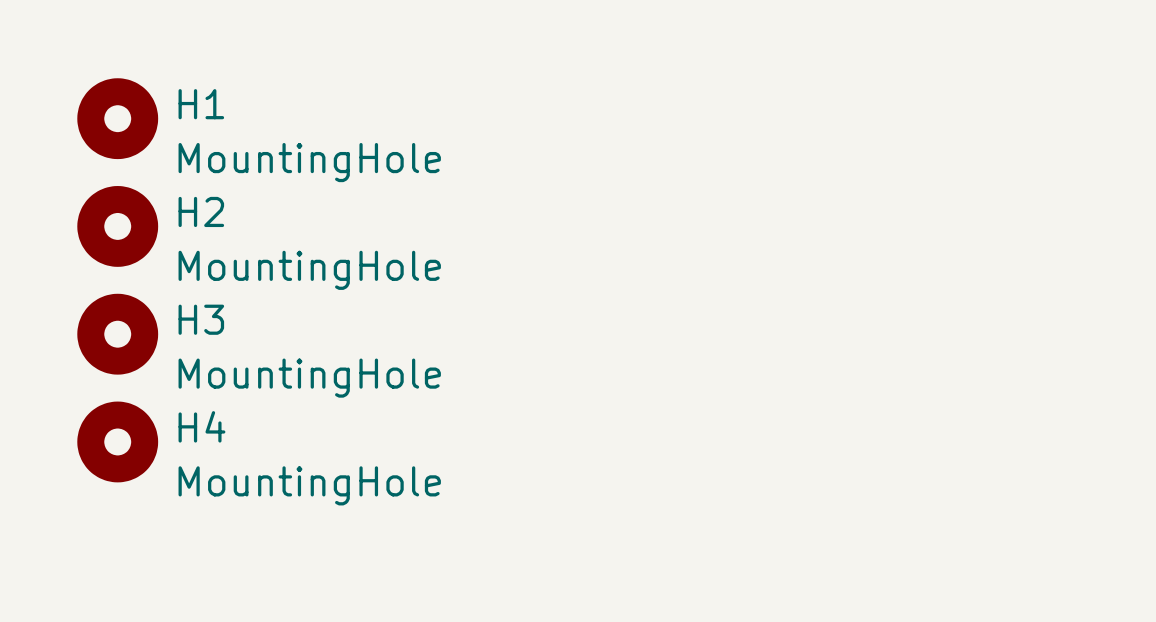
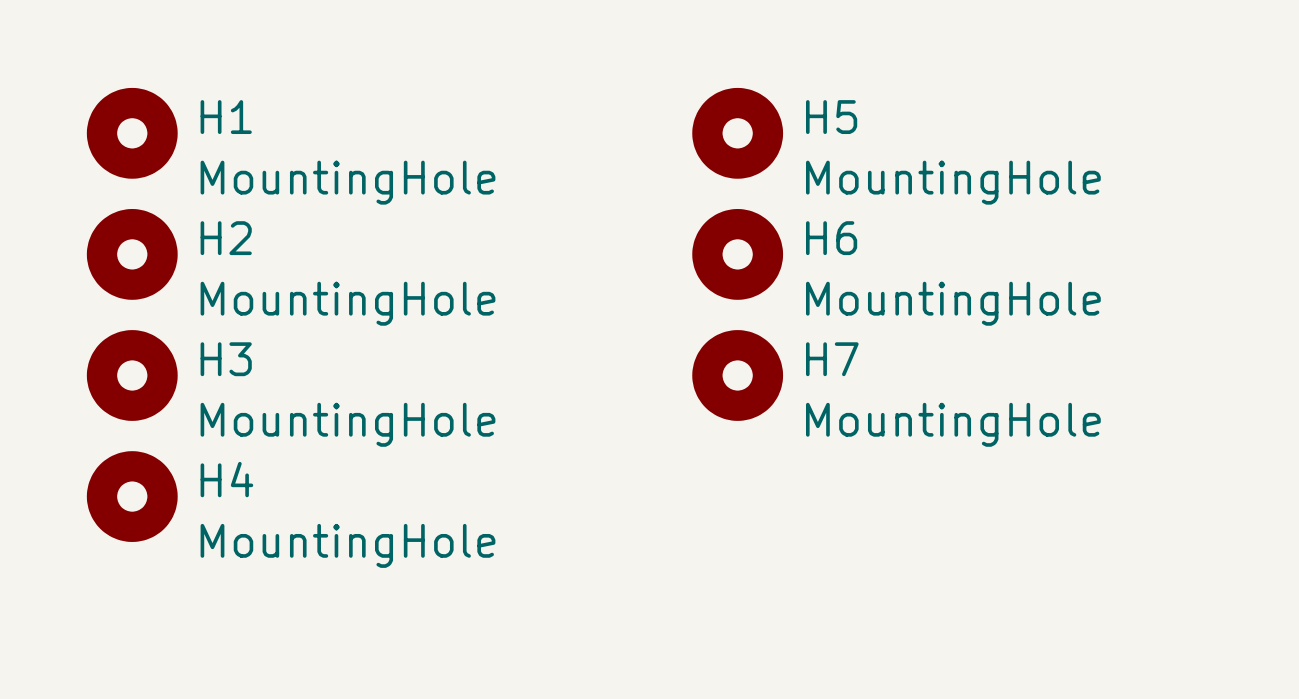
H5: none -> MountingHole (737, 133)
H6: none -> MountingHole (737, 254)
H7: none -> MountingHole (737, 375)

